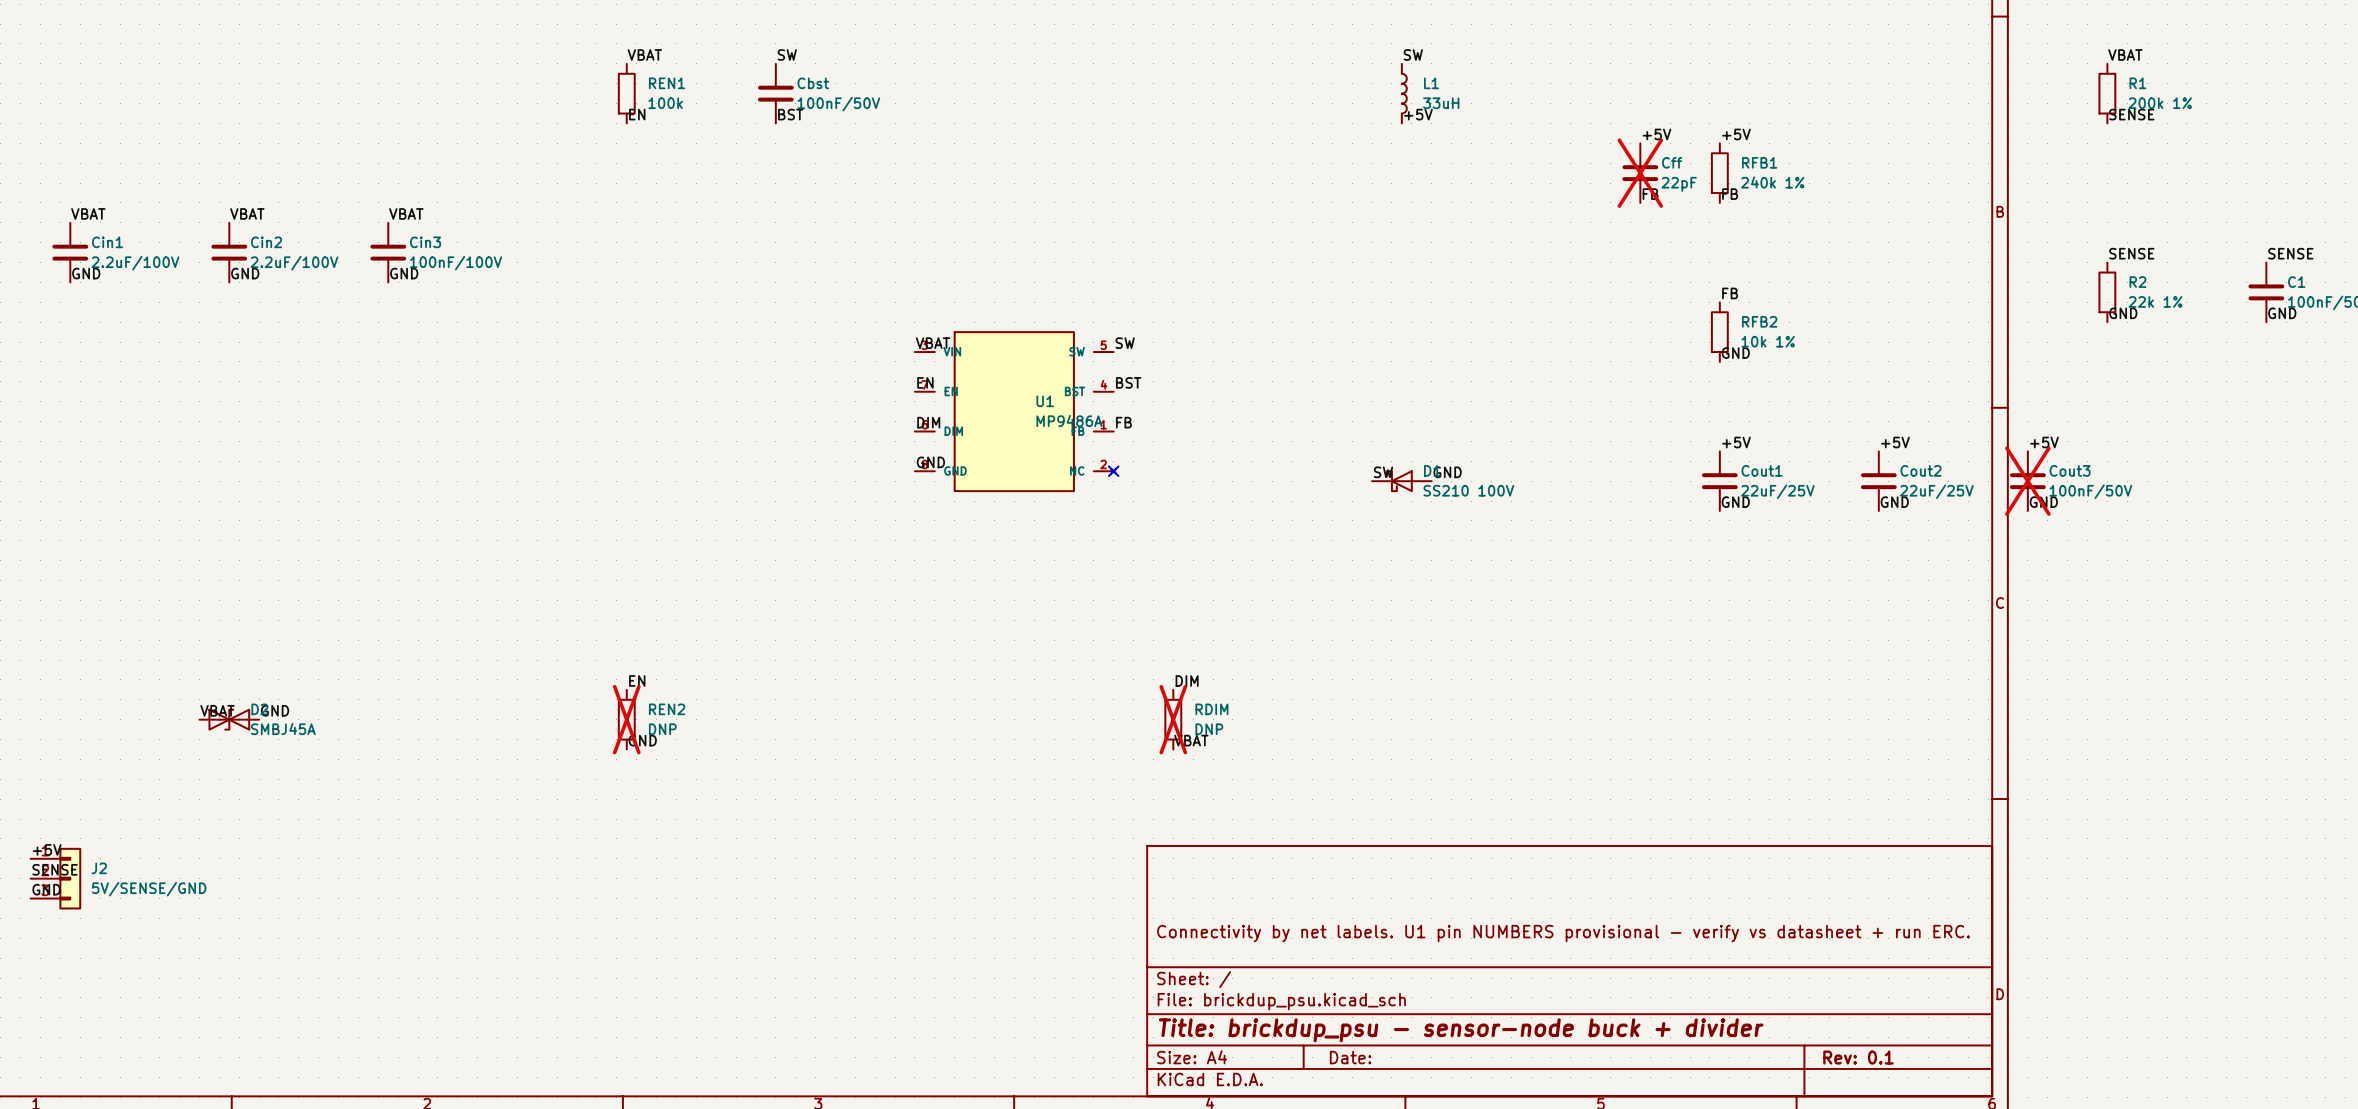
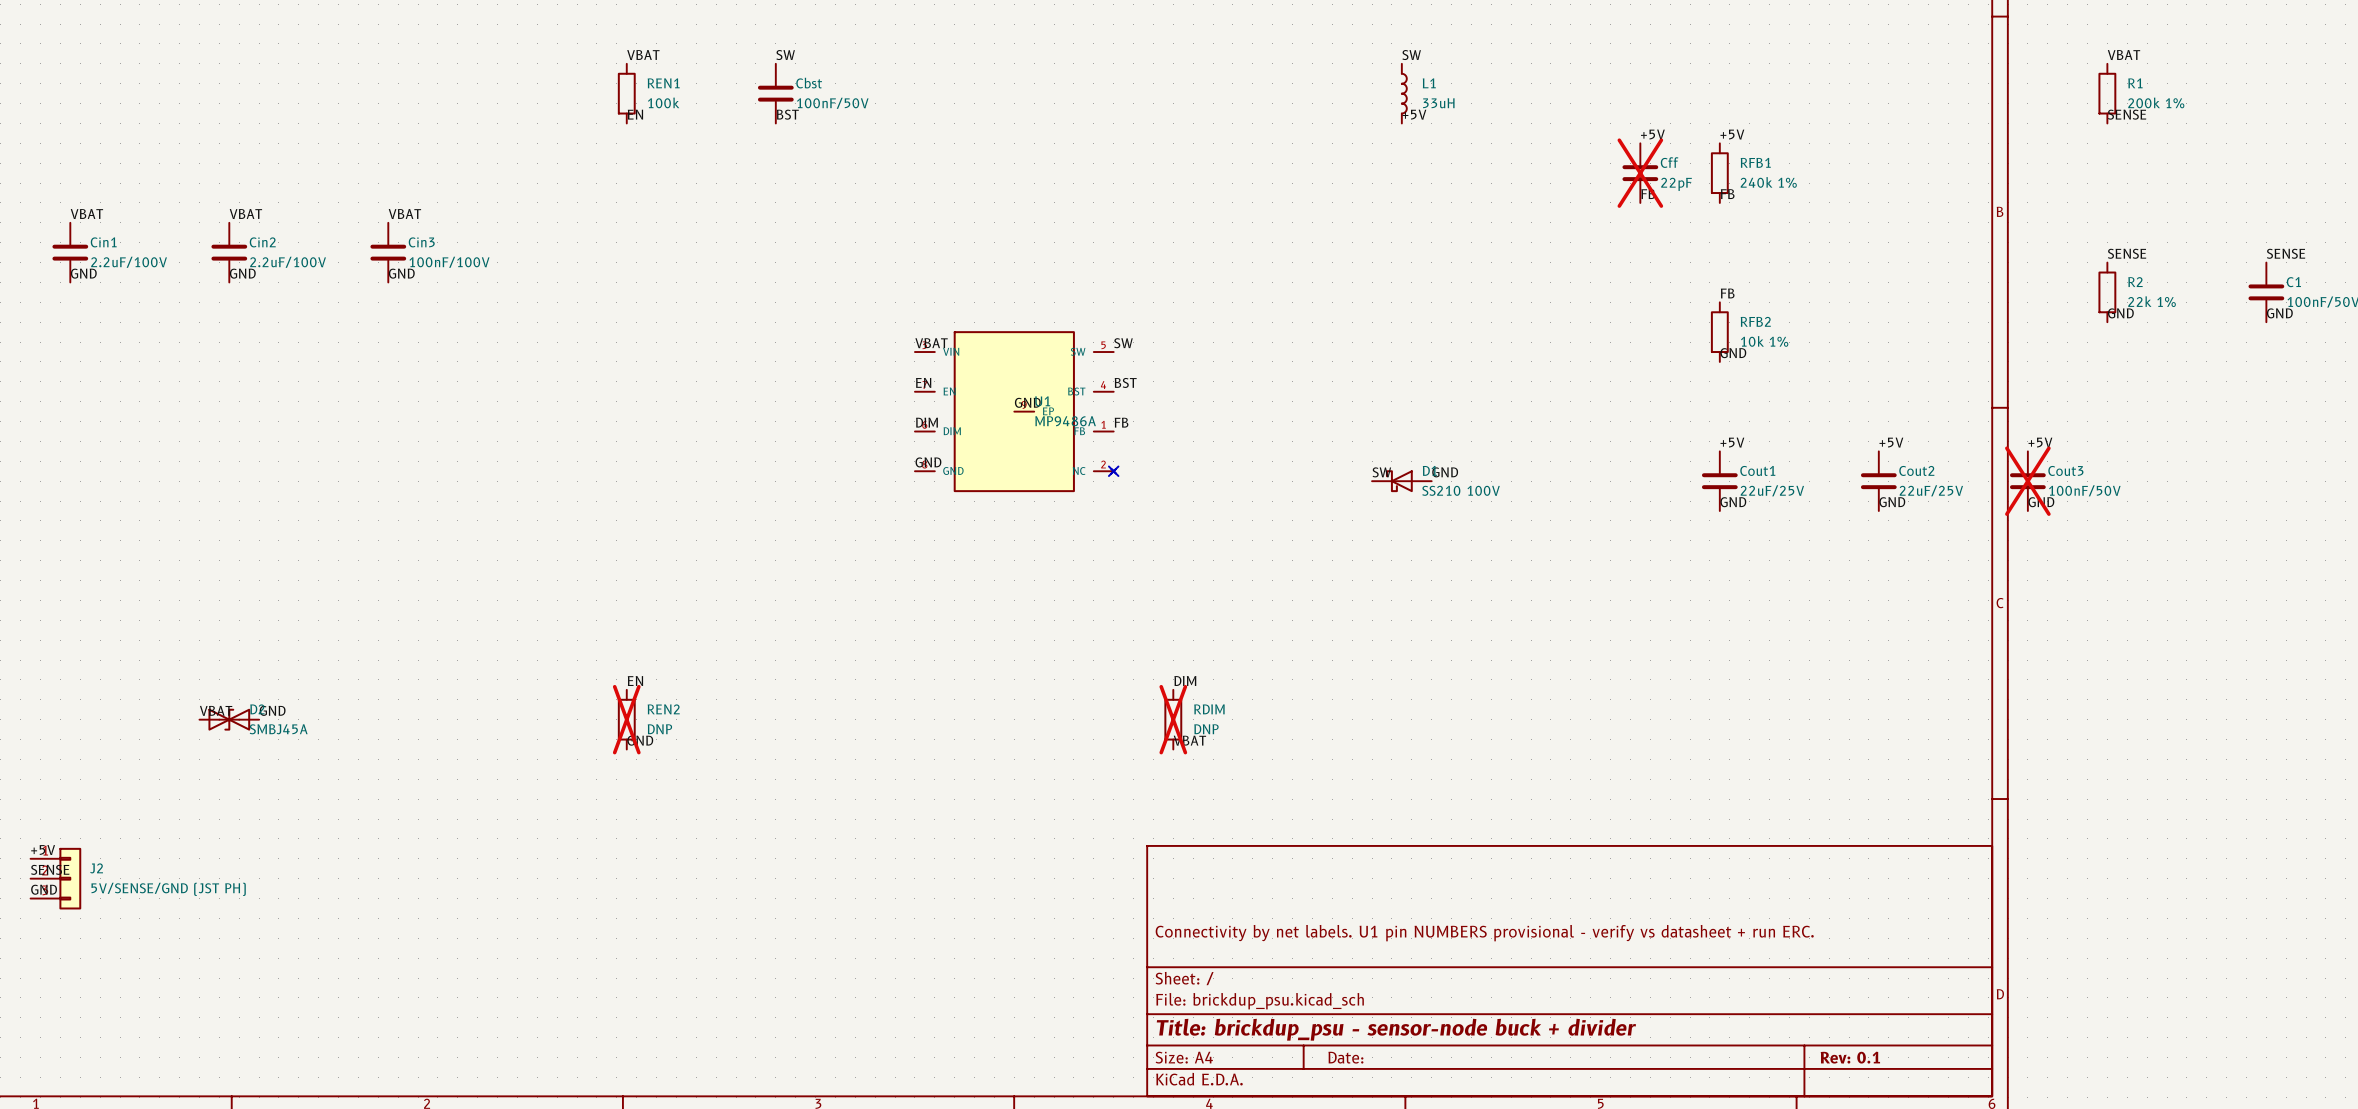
U1 symbol: [914, 331, 1117, 493] -> [914, 331, 1117, 493]
label: none -> GND (1027, 402)
J2 value: 5V/SENSE/GND (149, 889) -> 5V/SENSE/GND (JST PH) (168, 889)

